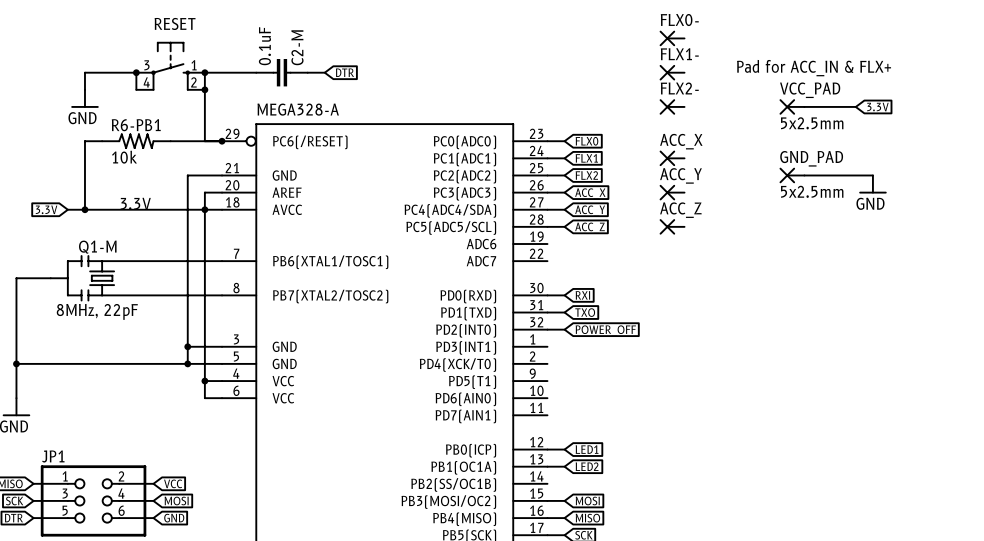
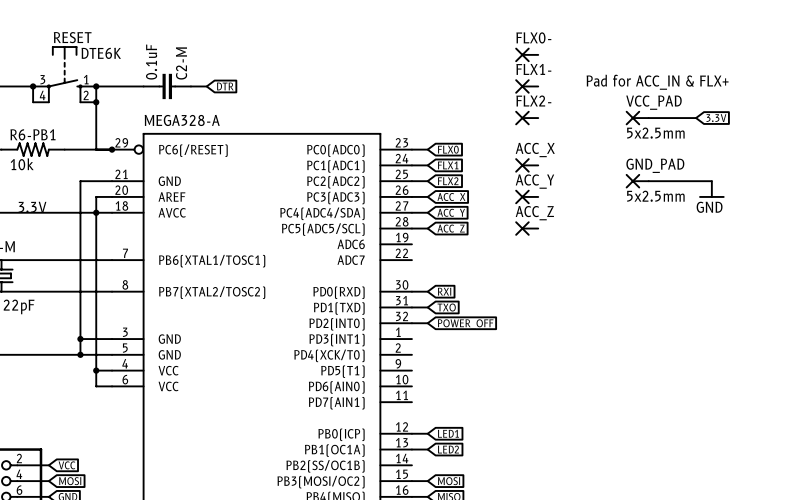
RESET value: none -> DTE6K (101, 53)
RESET symbol: [136, 41, 205, 91] -> [33, 46, 97, 103]

